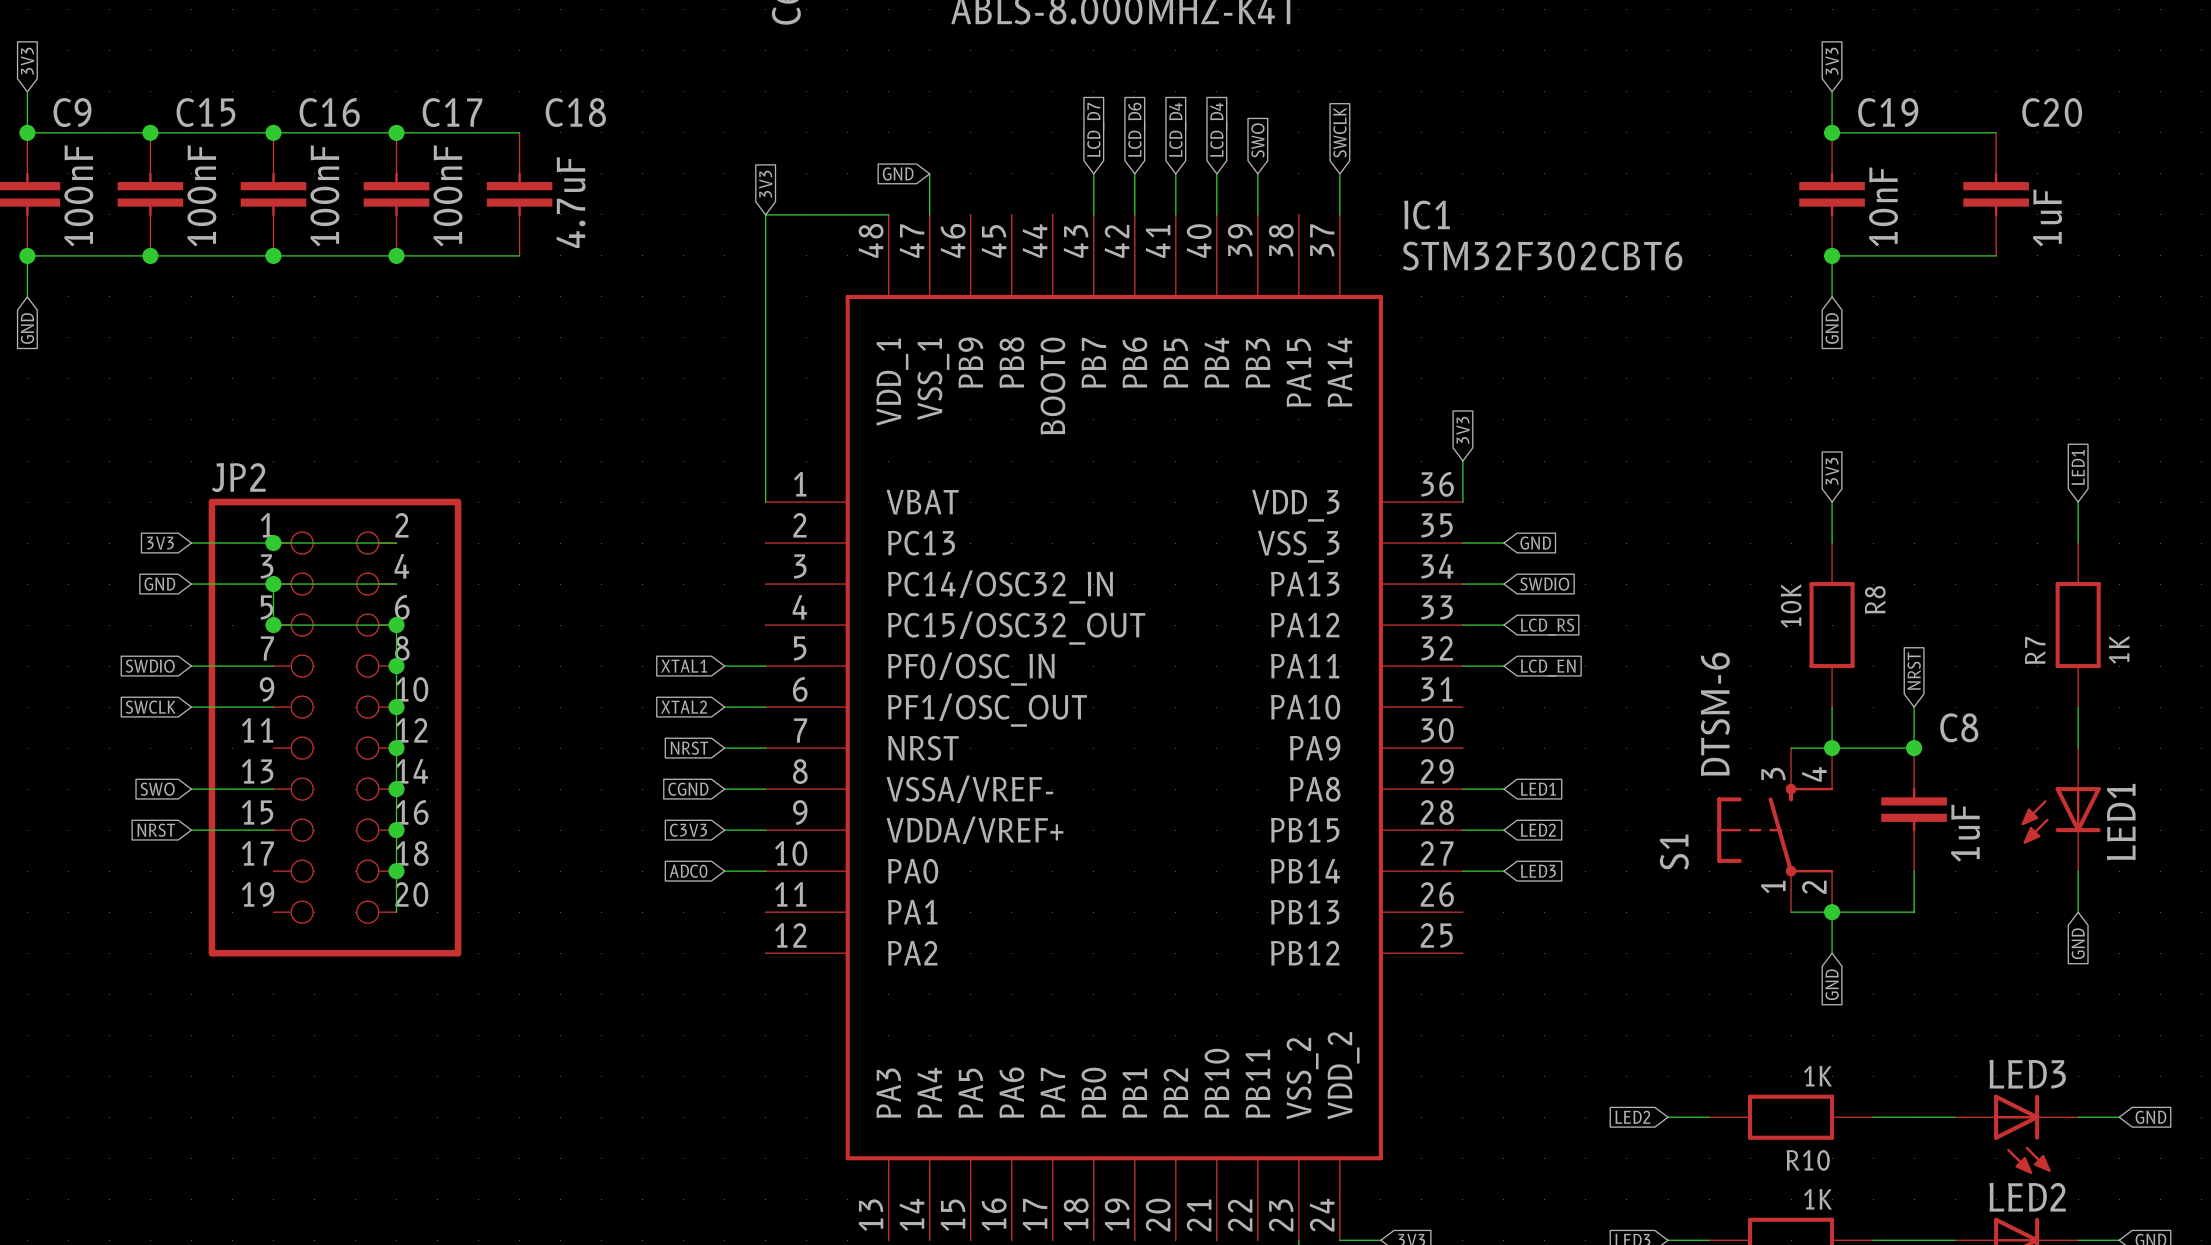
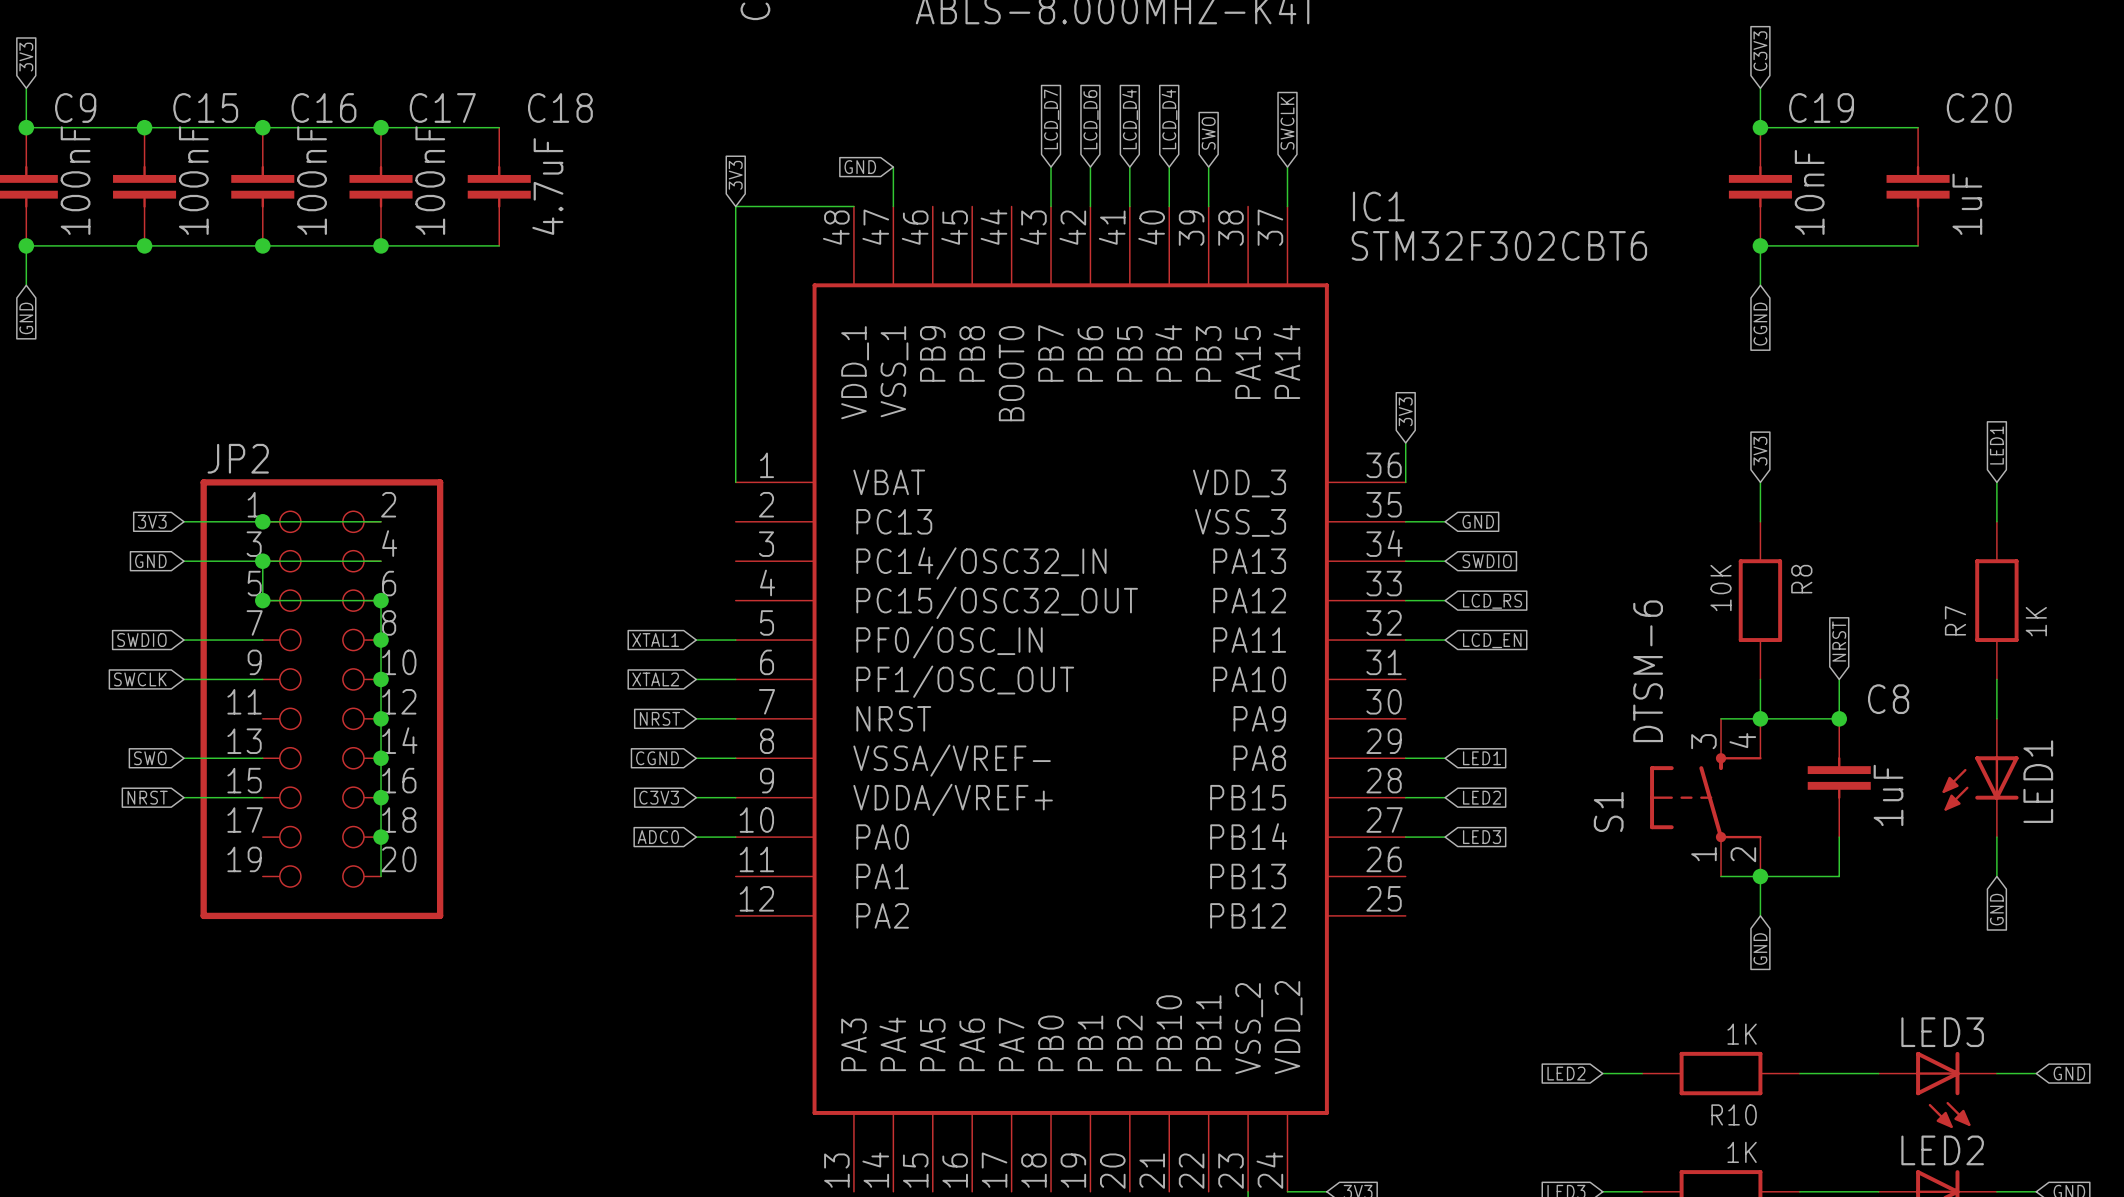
global label: 3V3 (1832, 61) -> C3V3 (1760, 51)
global label: GND (1832, 328) -> CGND (1760, 324)

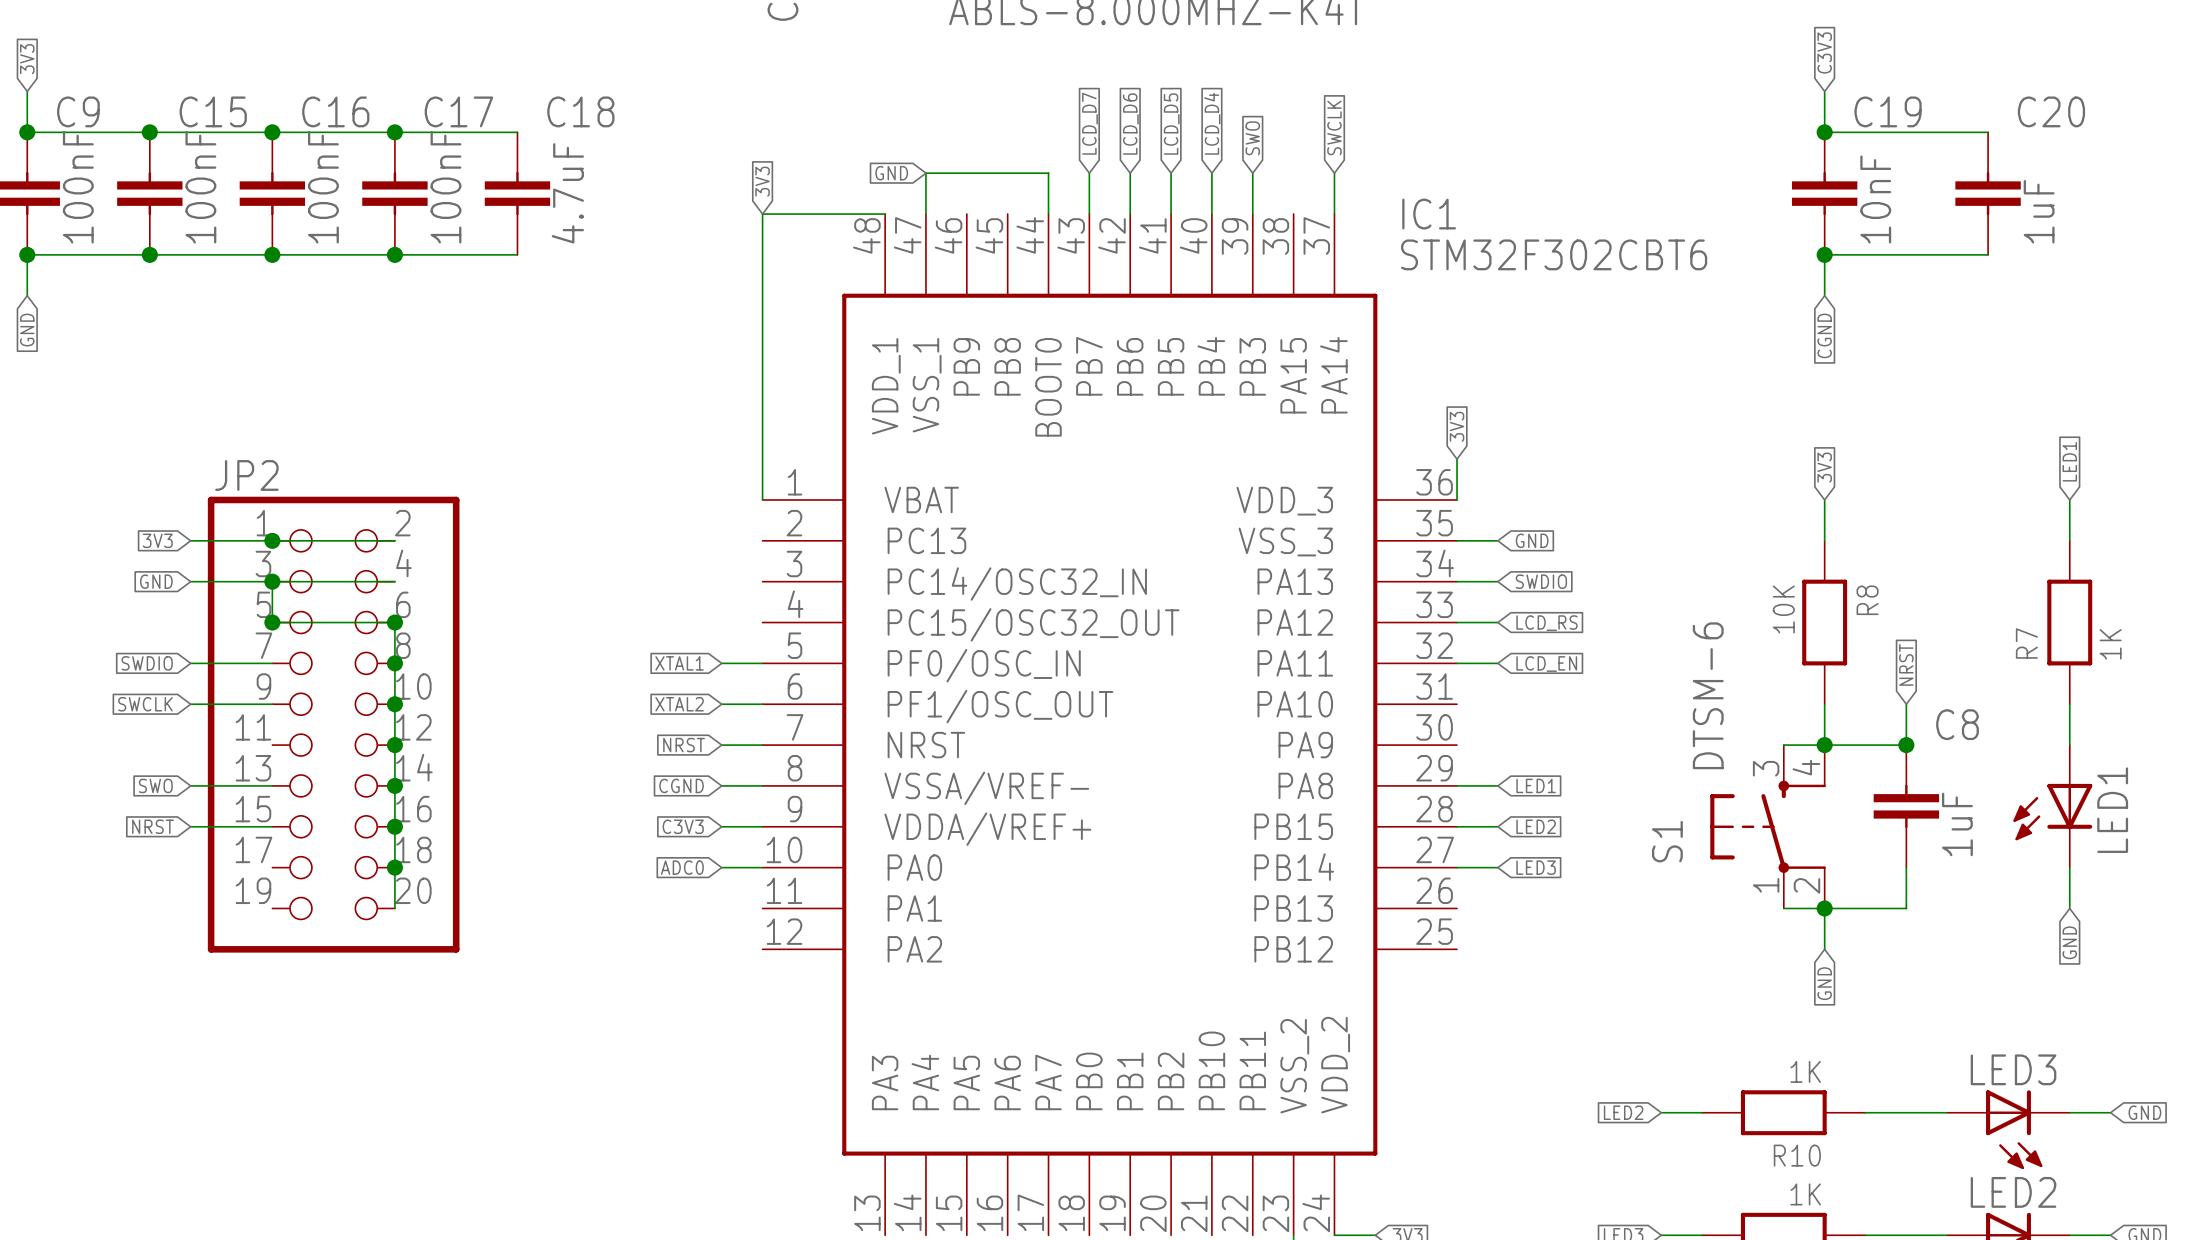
global label: LCD_D4 (1130, 119) -> LCD_D5 (1171, 124)
wire: none -> (925, 173) (1048, 173) (1048, 214)

